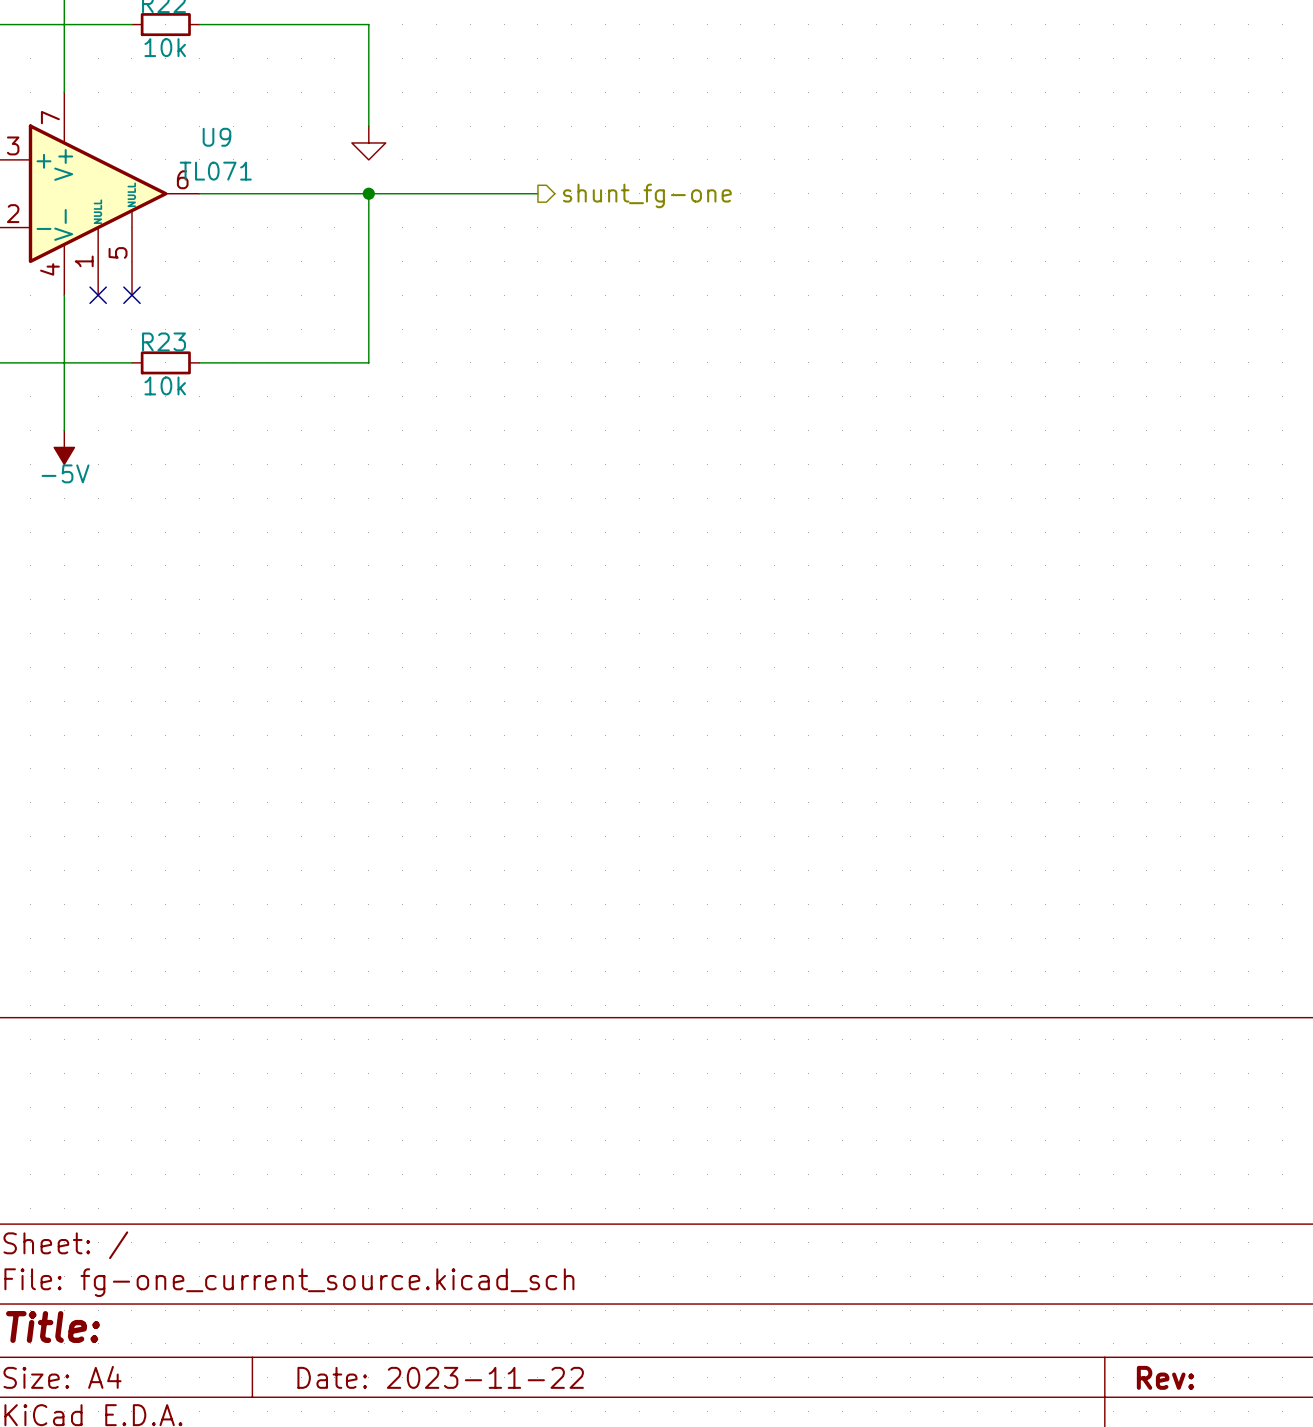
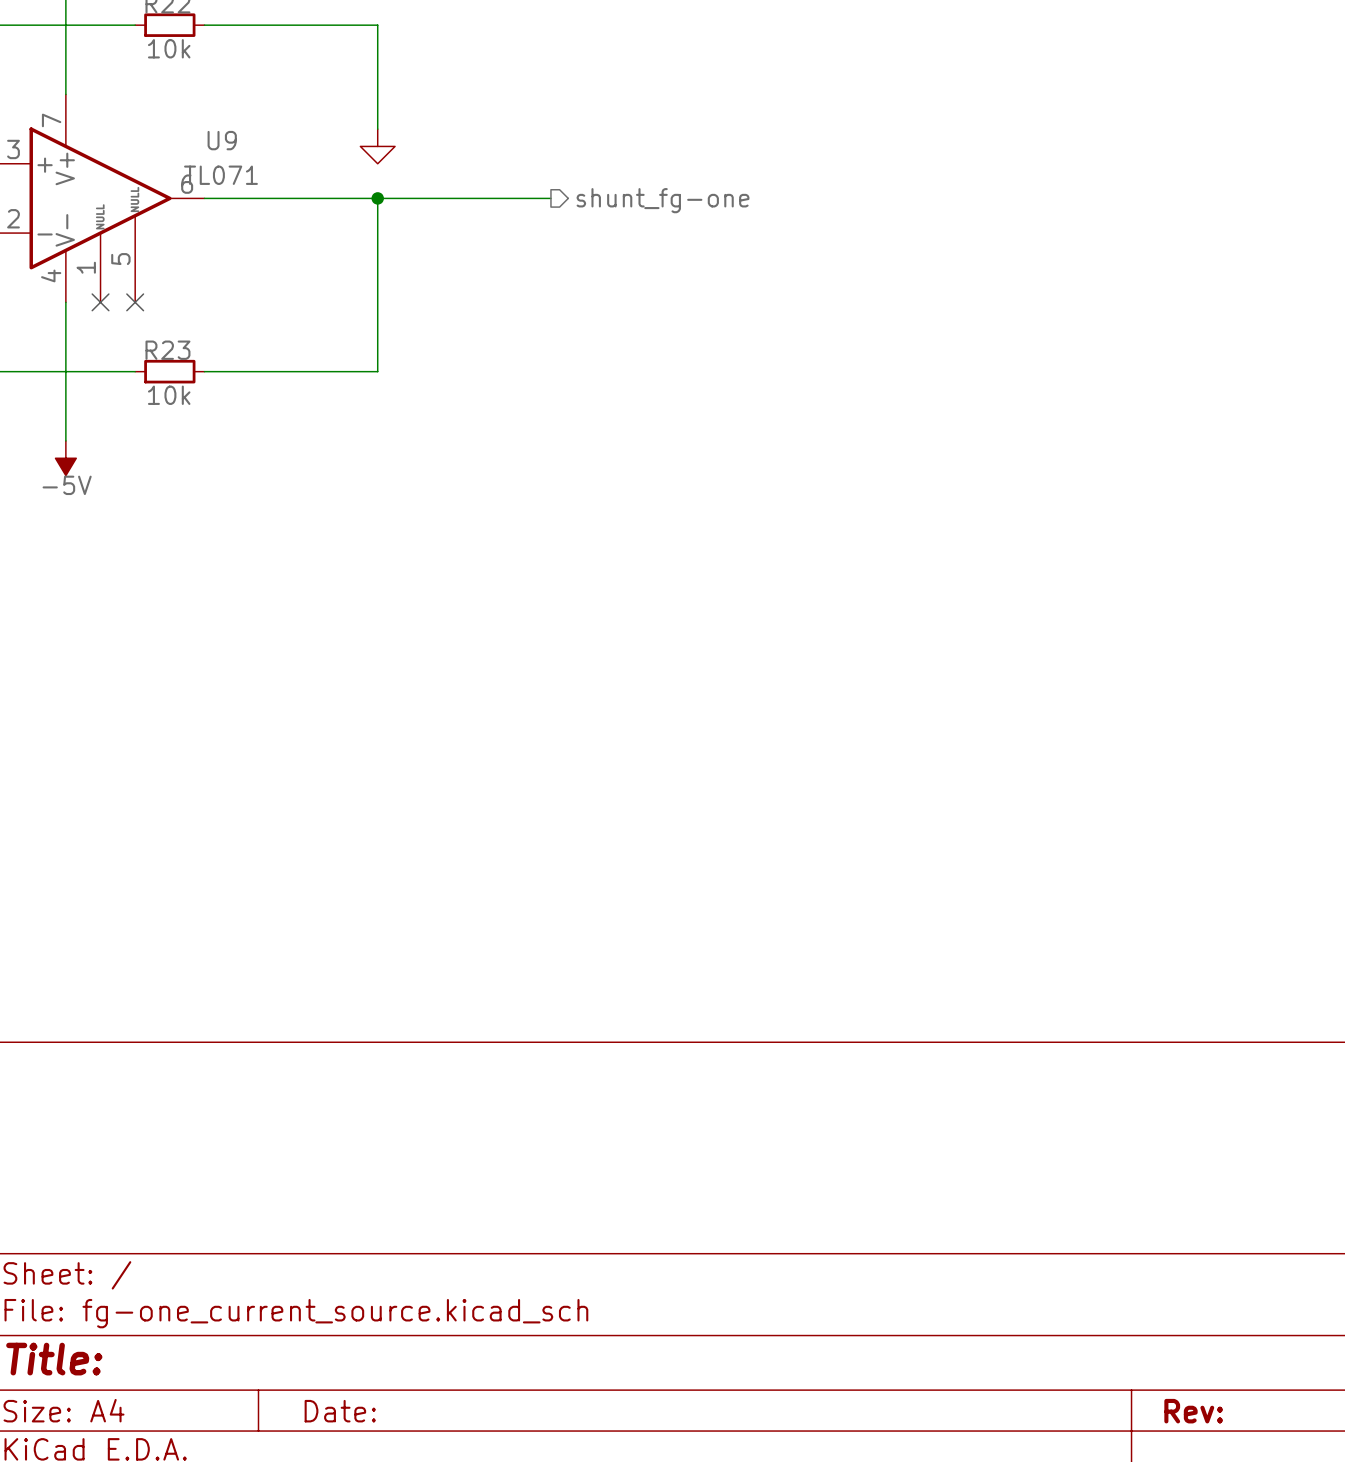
title block: Date: 2023-11-22 (440, 1377) -> Date: (340, 1411)

